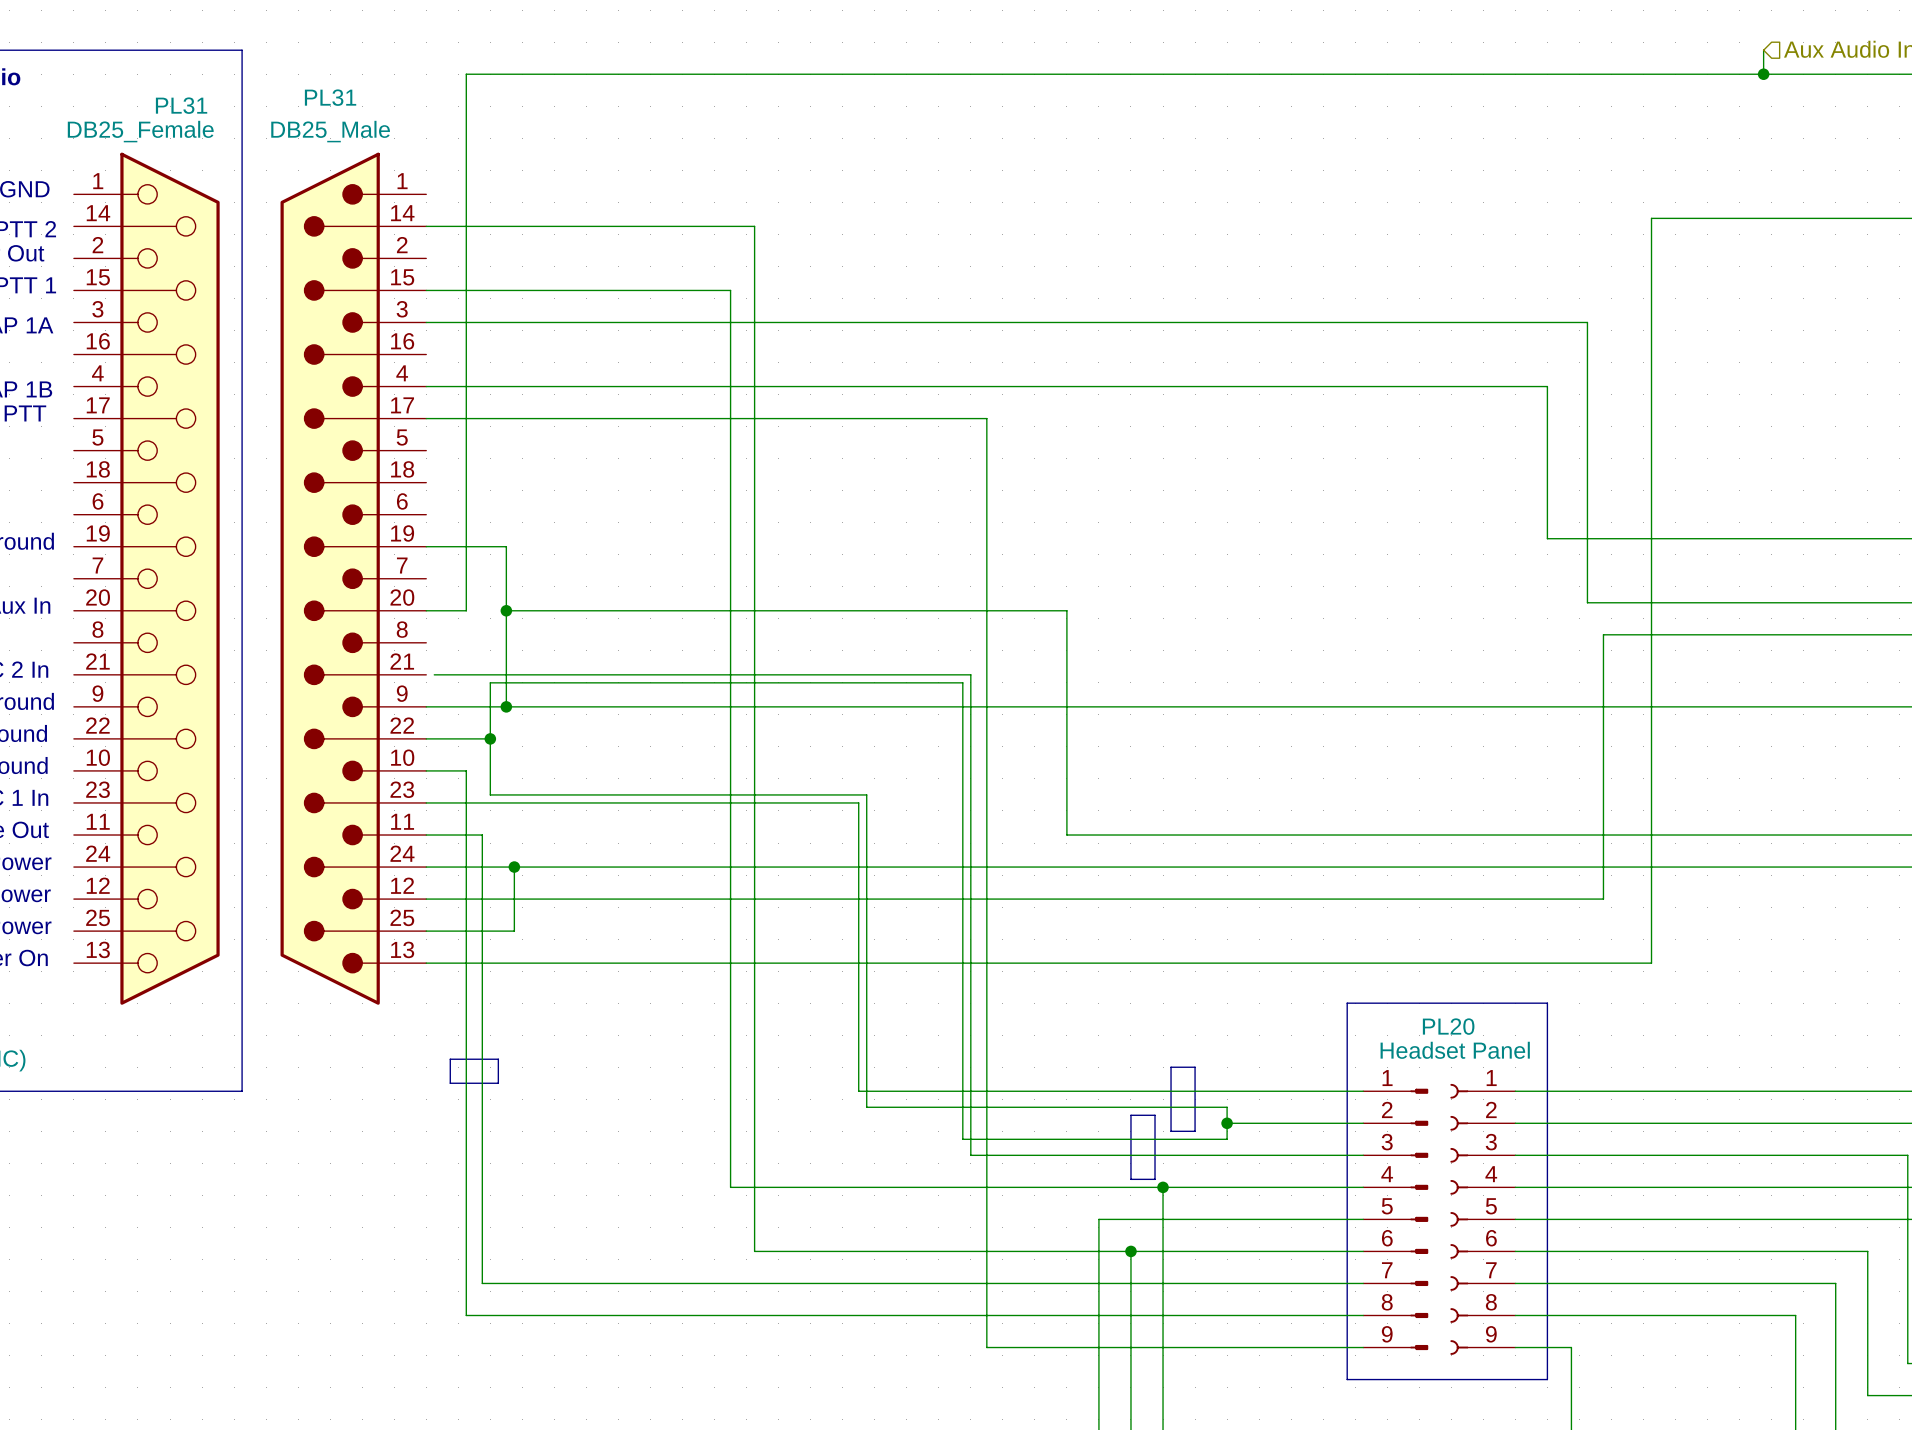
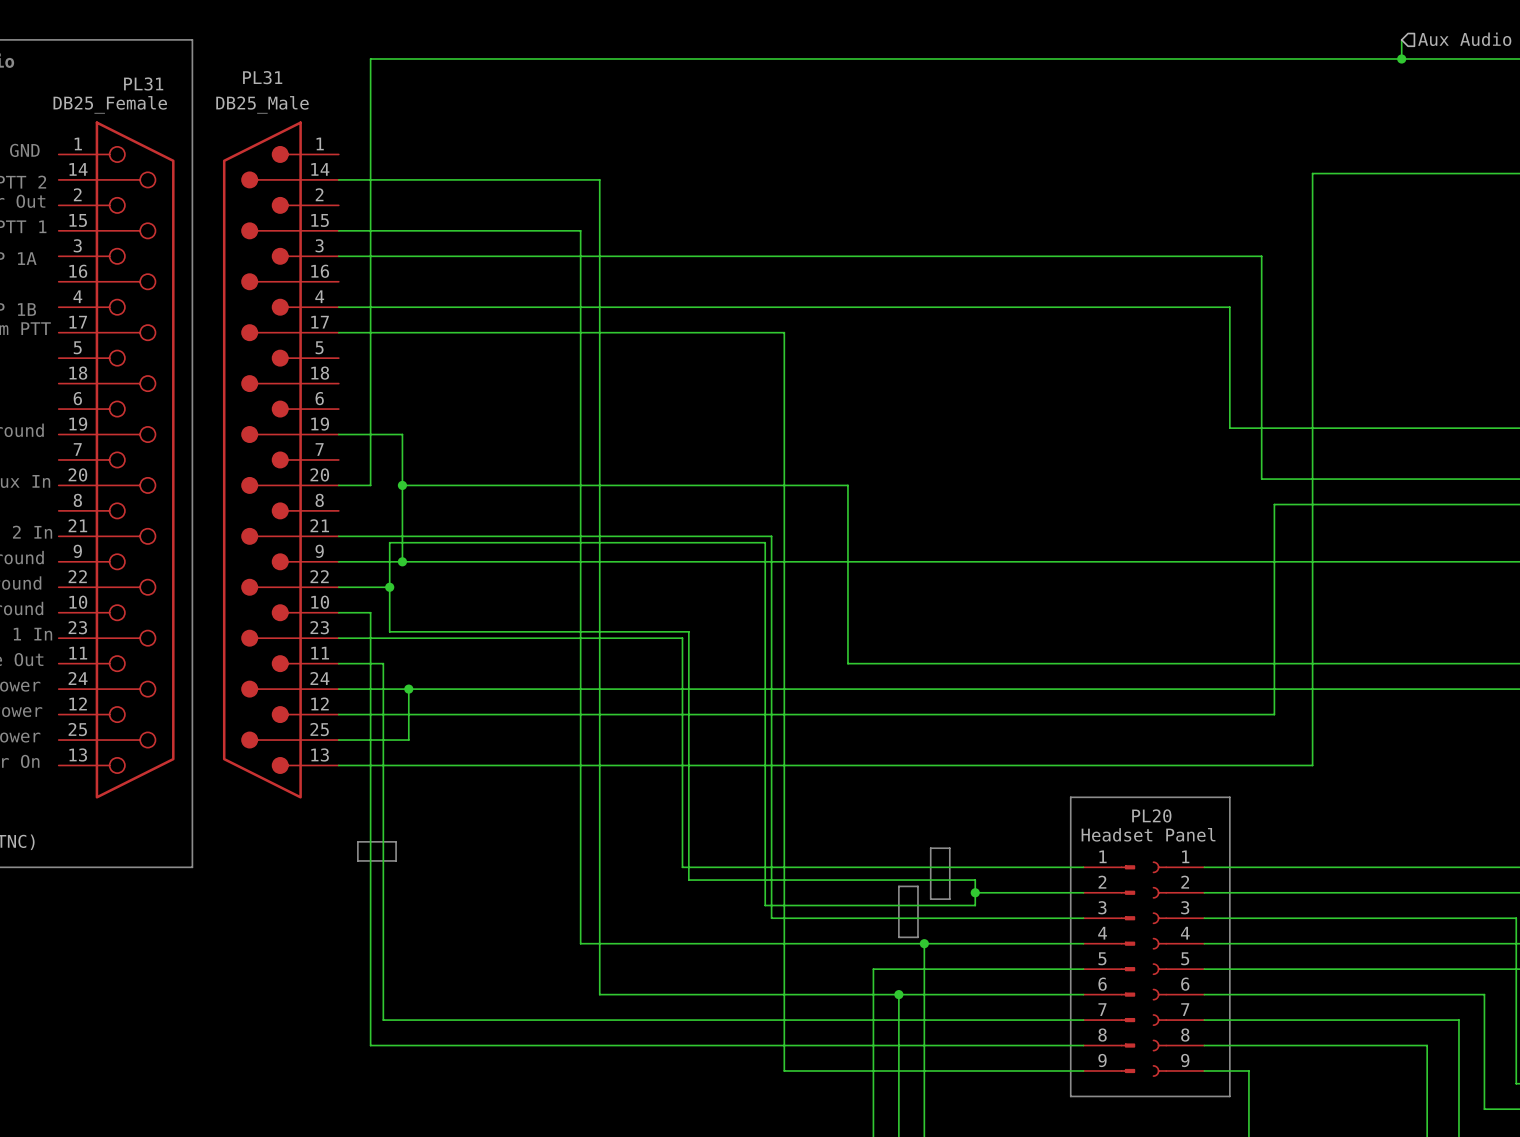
wire: none -> (338, 536) (345, 536)

